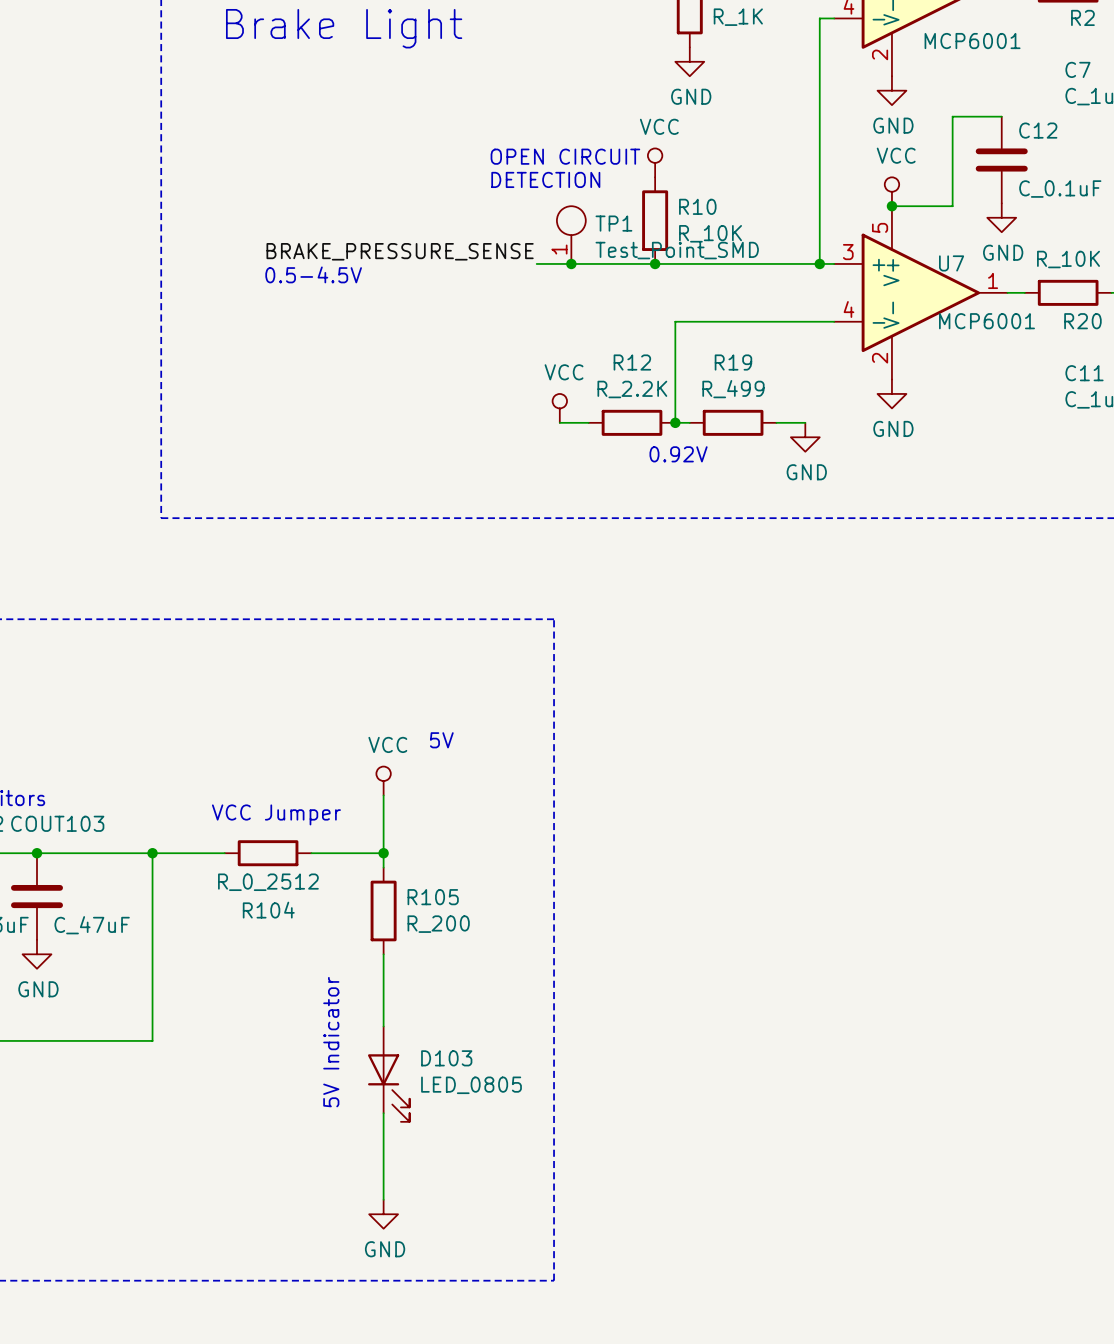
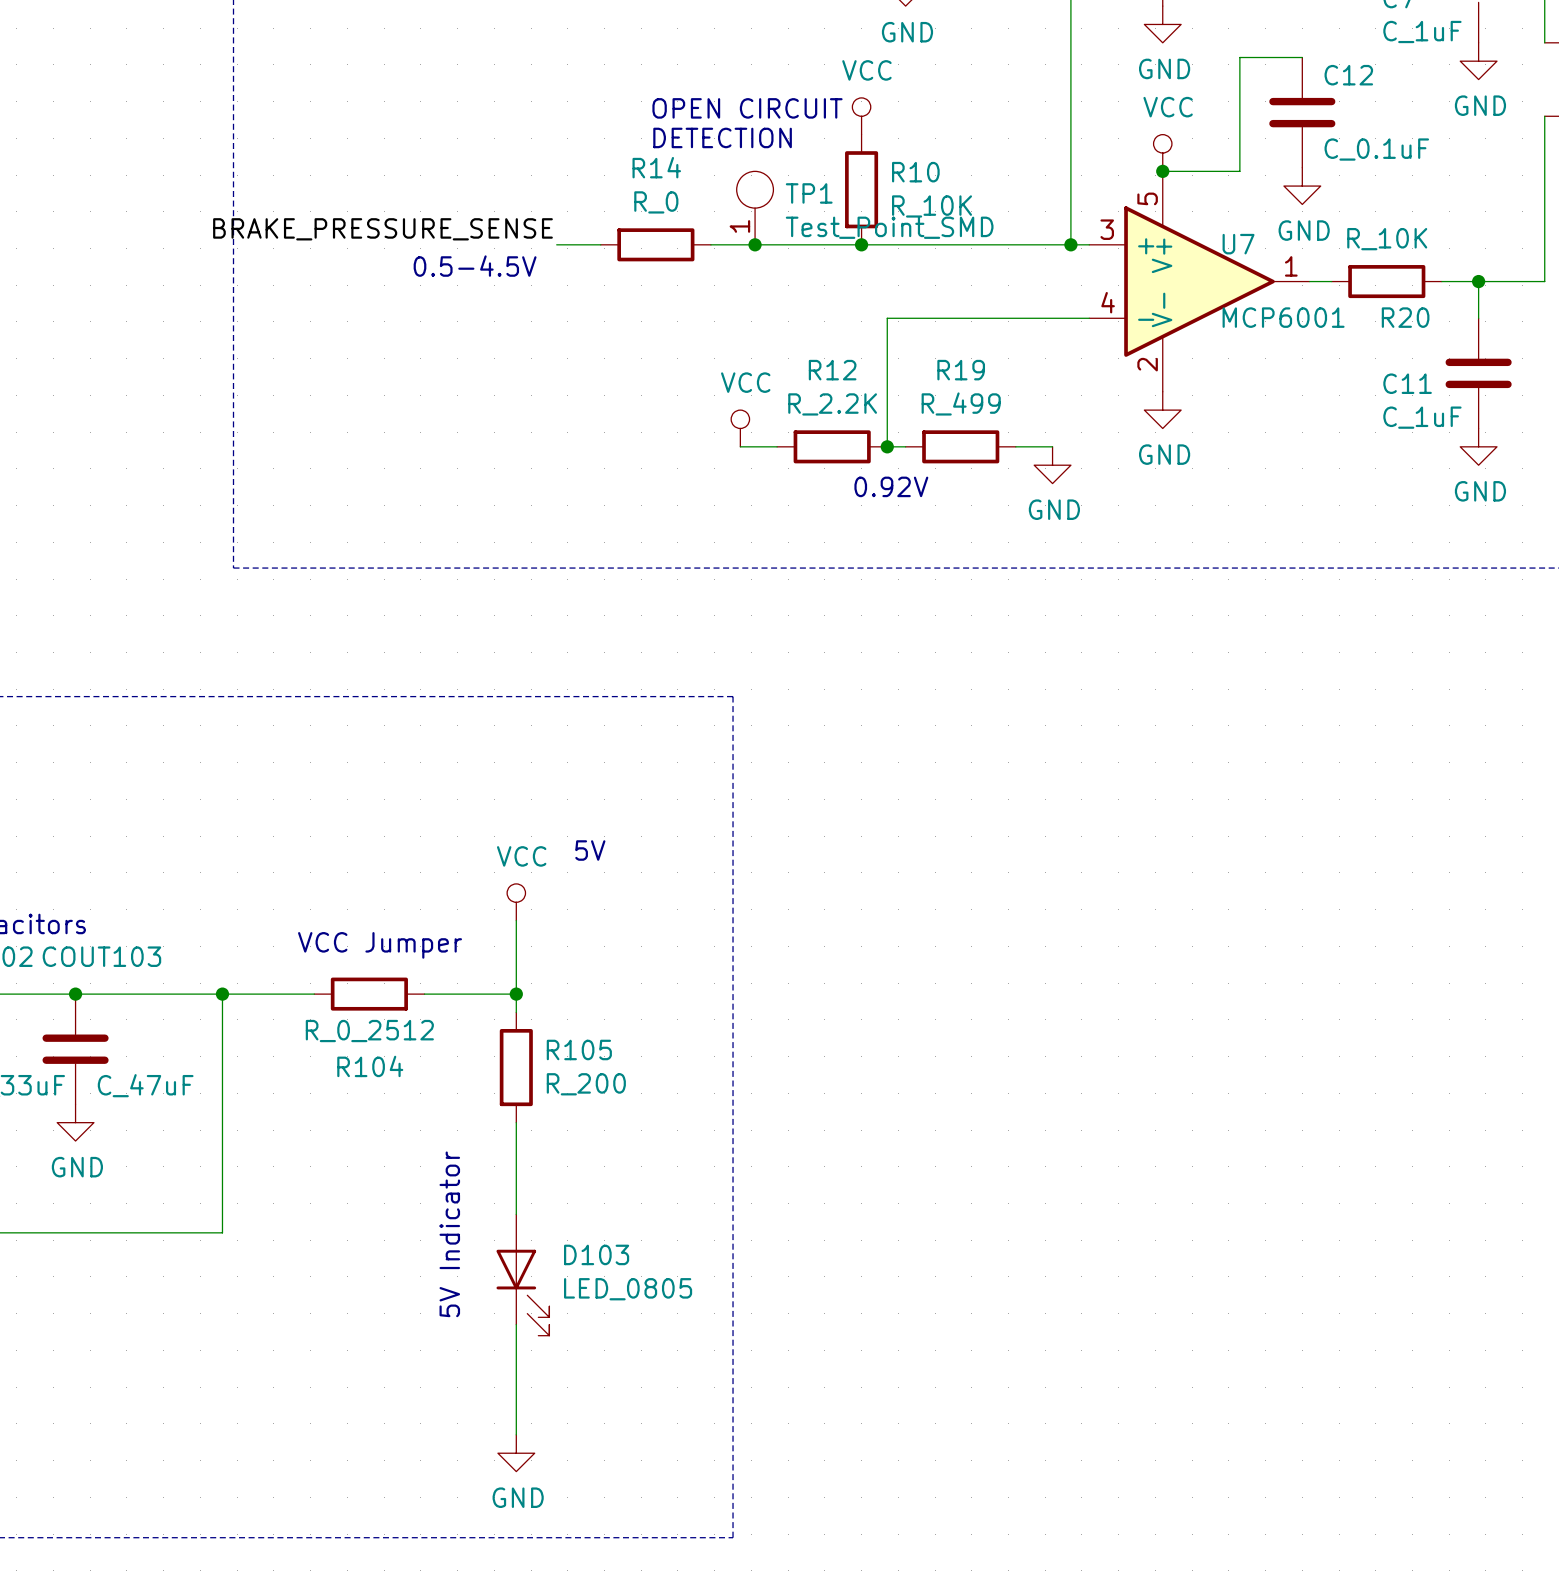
label position: BRAKE_PRESSURE_SENSE (400, 251) -> BRAKE_PRESSURE_SENSE (382, 229)
wire: none -> (556, 244) (600, 244)
R14: none -> R_0 (655, 244)
text position: 0.5-4.5V (313, 274) -> 0.5-4.5V (475, 266)

